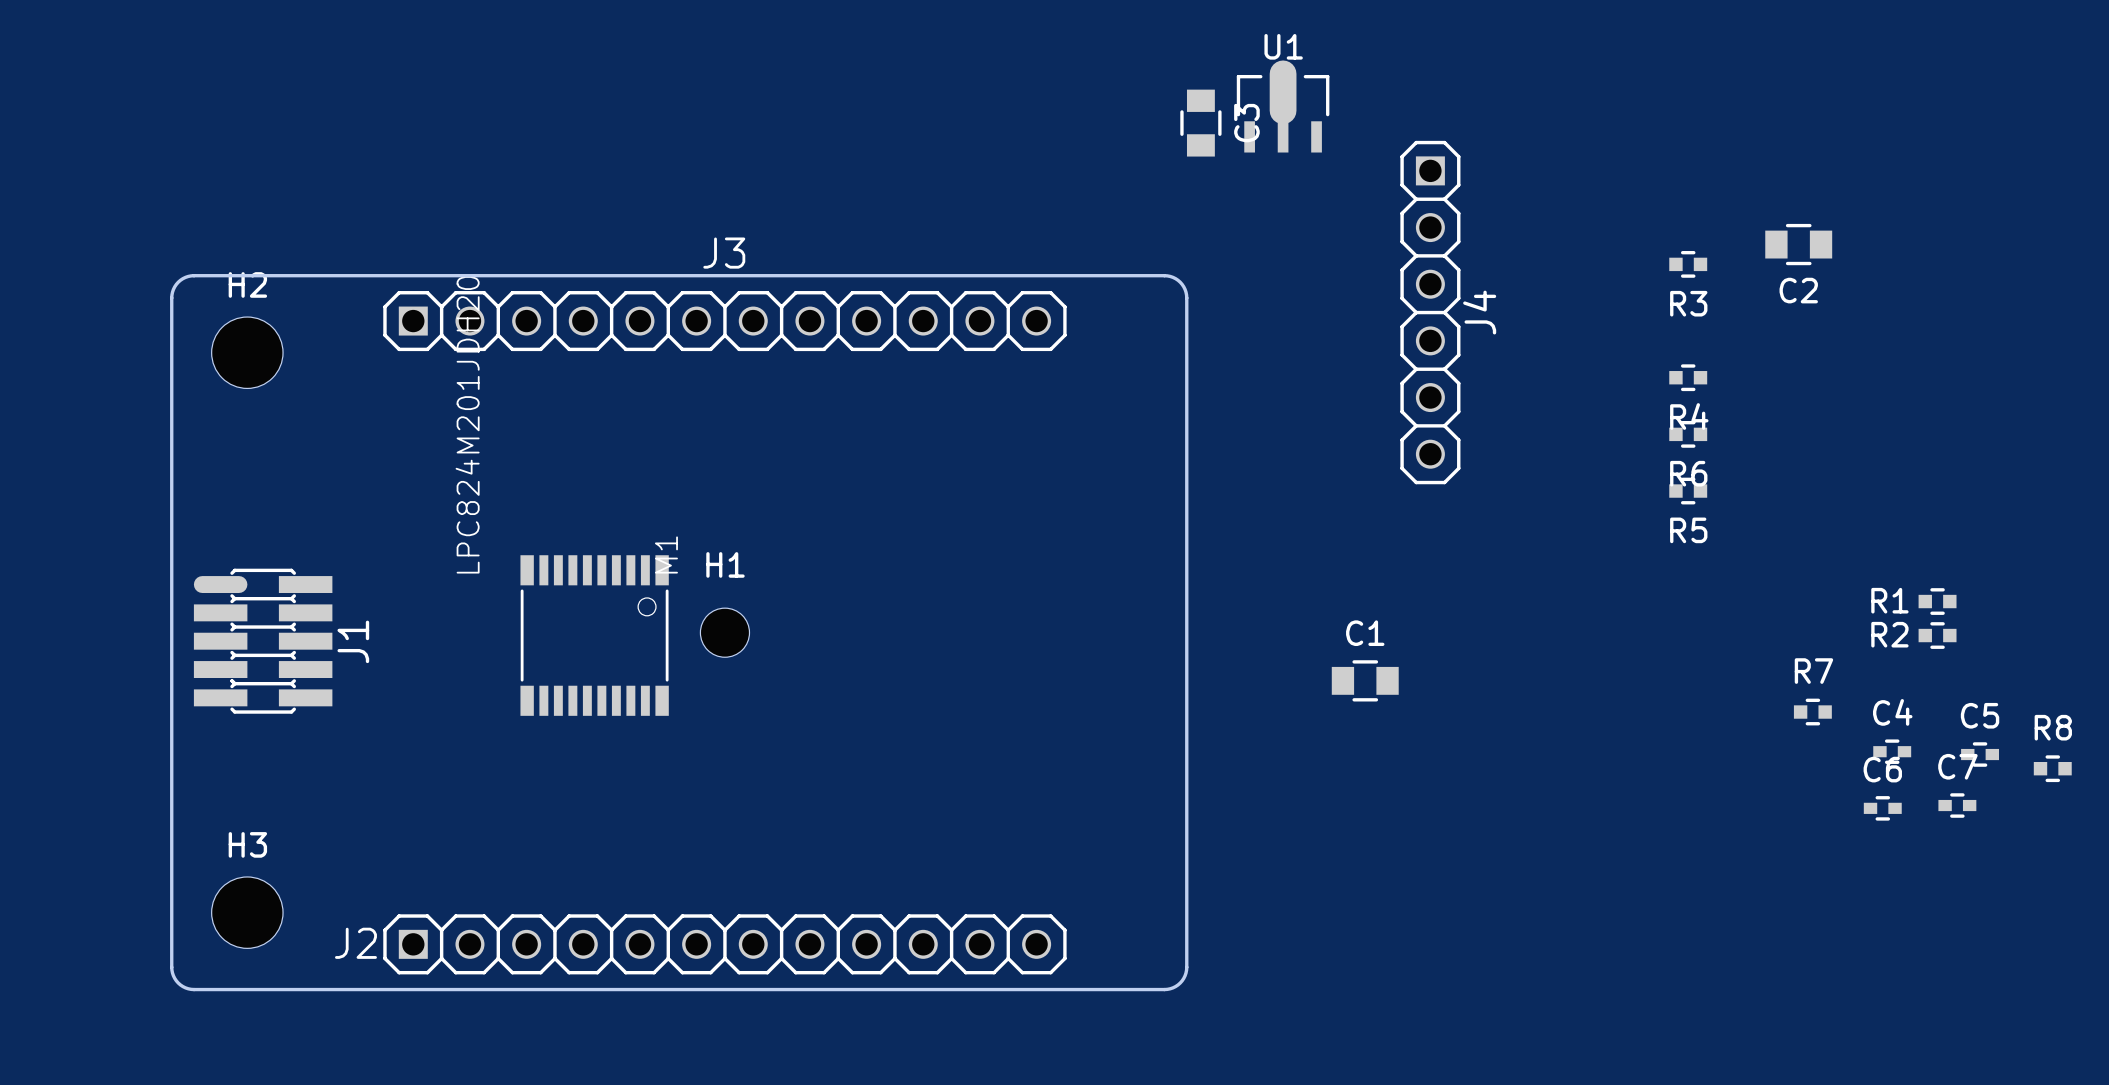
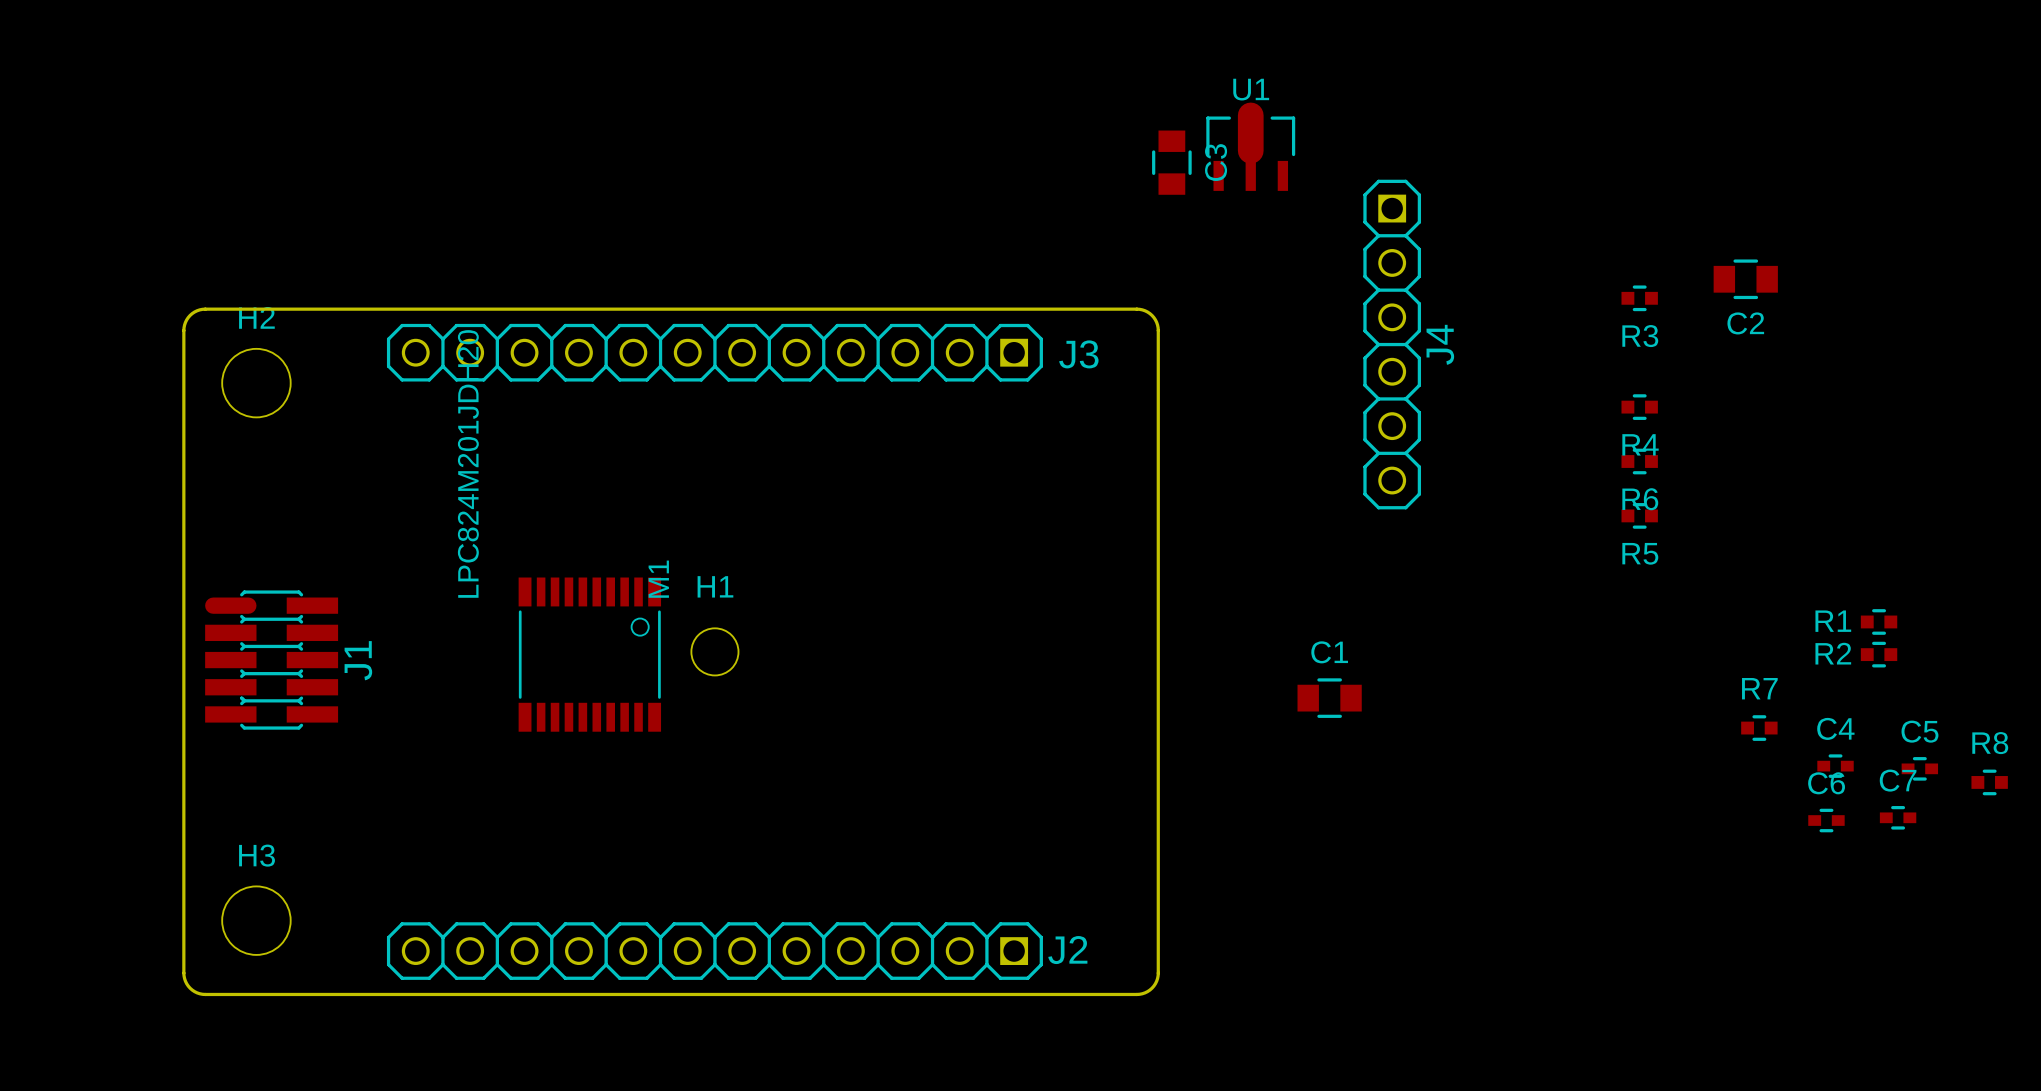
J3 name position: J3 (724, 253) -> J3 (1078, 354)
J3 rotation: 0° (724, 321) -> 180° (714, 352)
J2 rotation: 0° (724, 944) -> 180° (714, 951)

